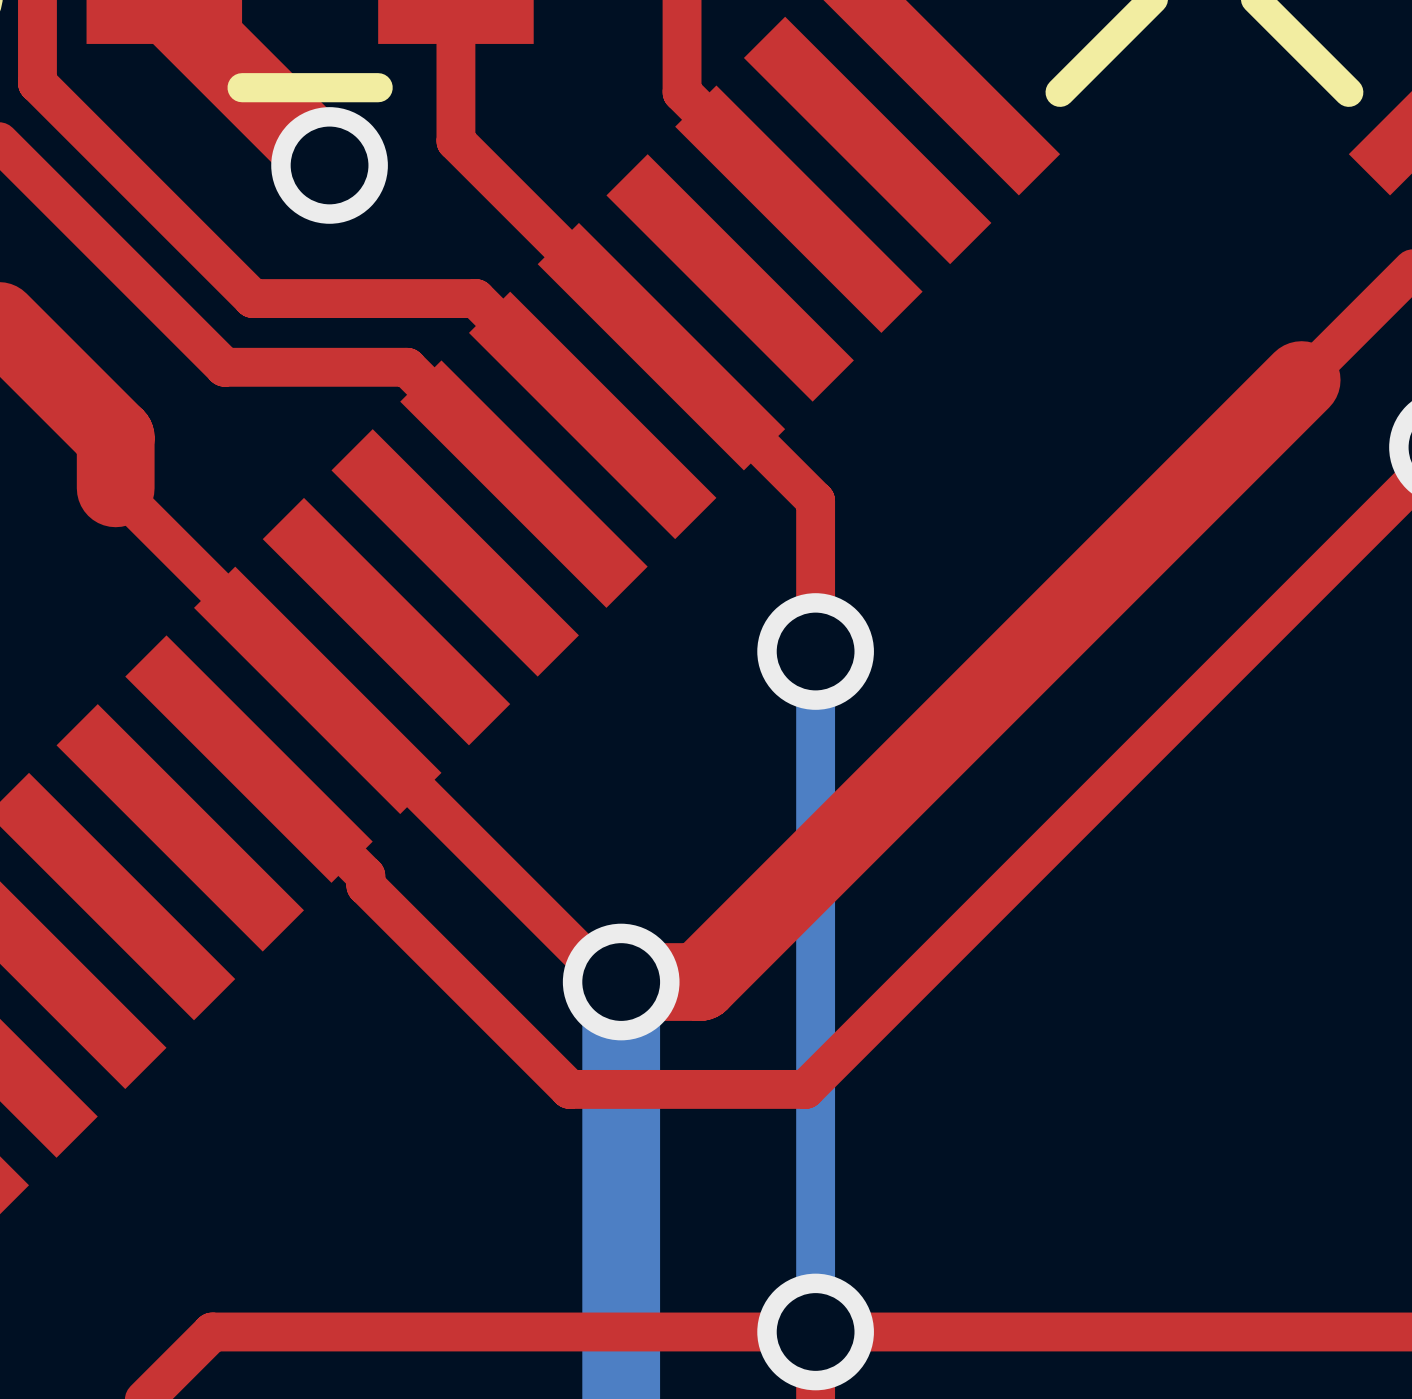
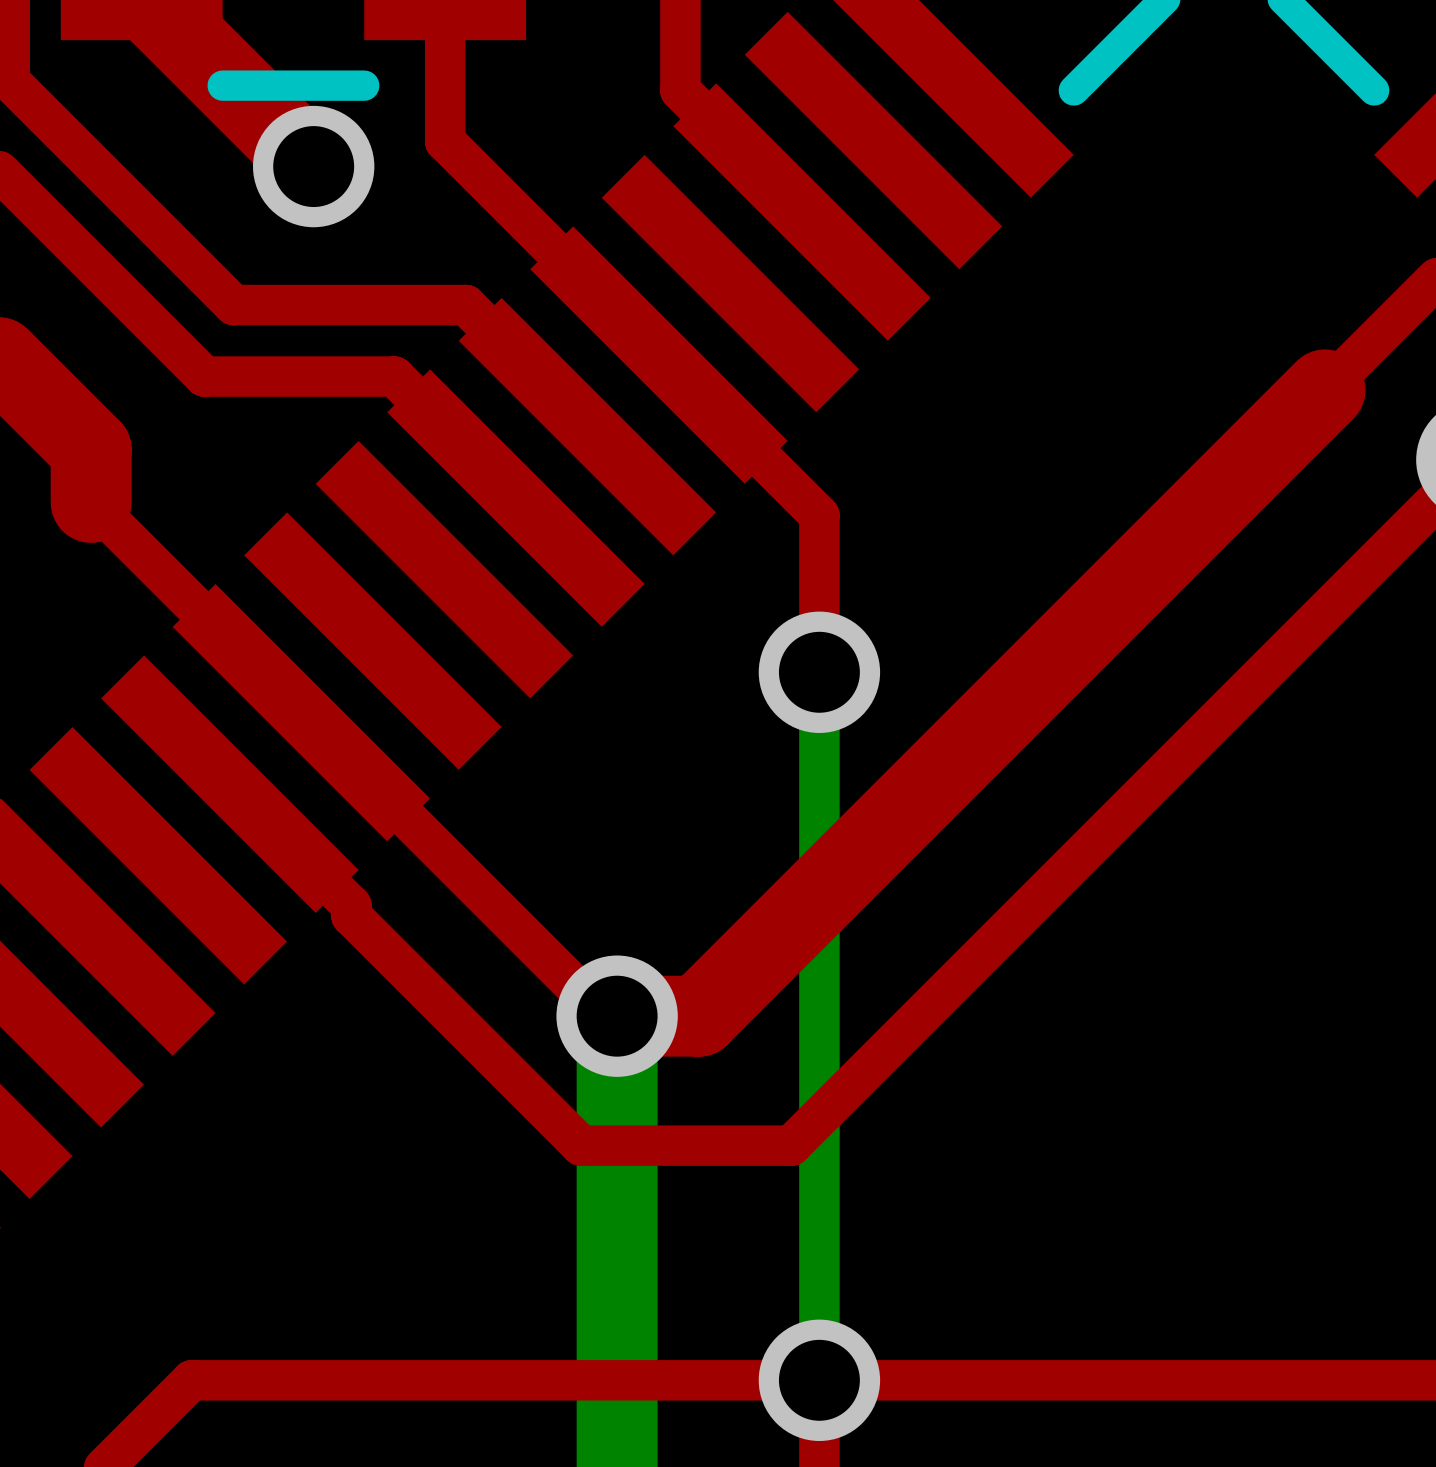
top track: (569, 1089) (805, 1089) -> (563, 1127) (581, 1145) (791, 1145) (808, 1127)

